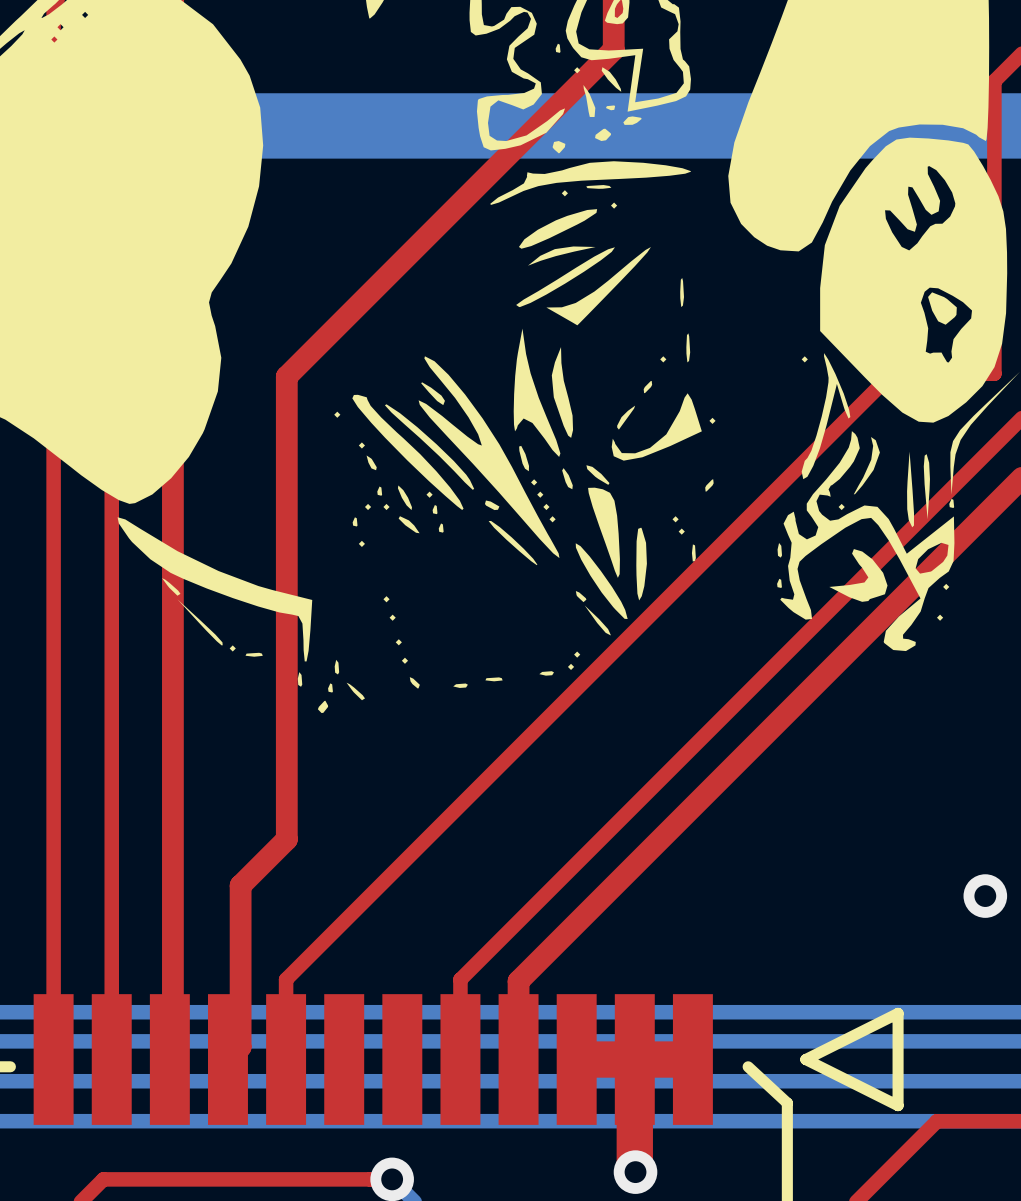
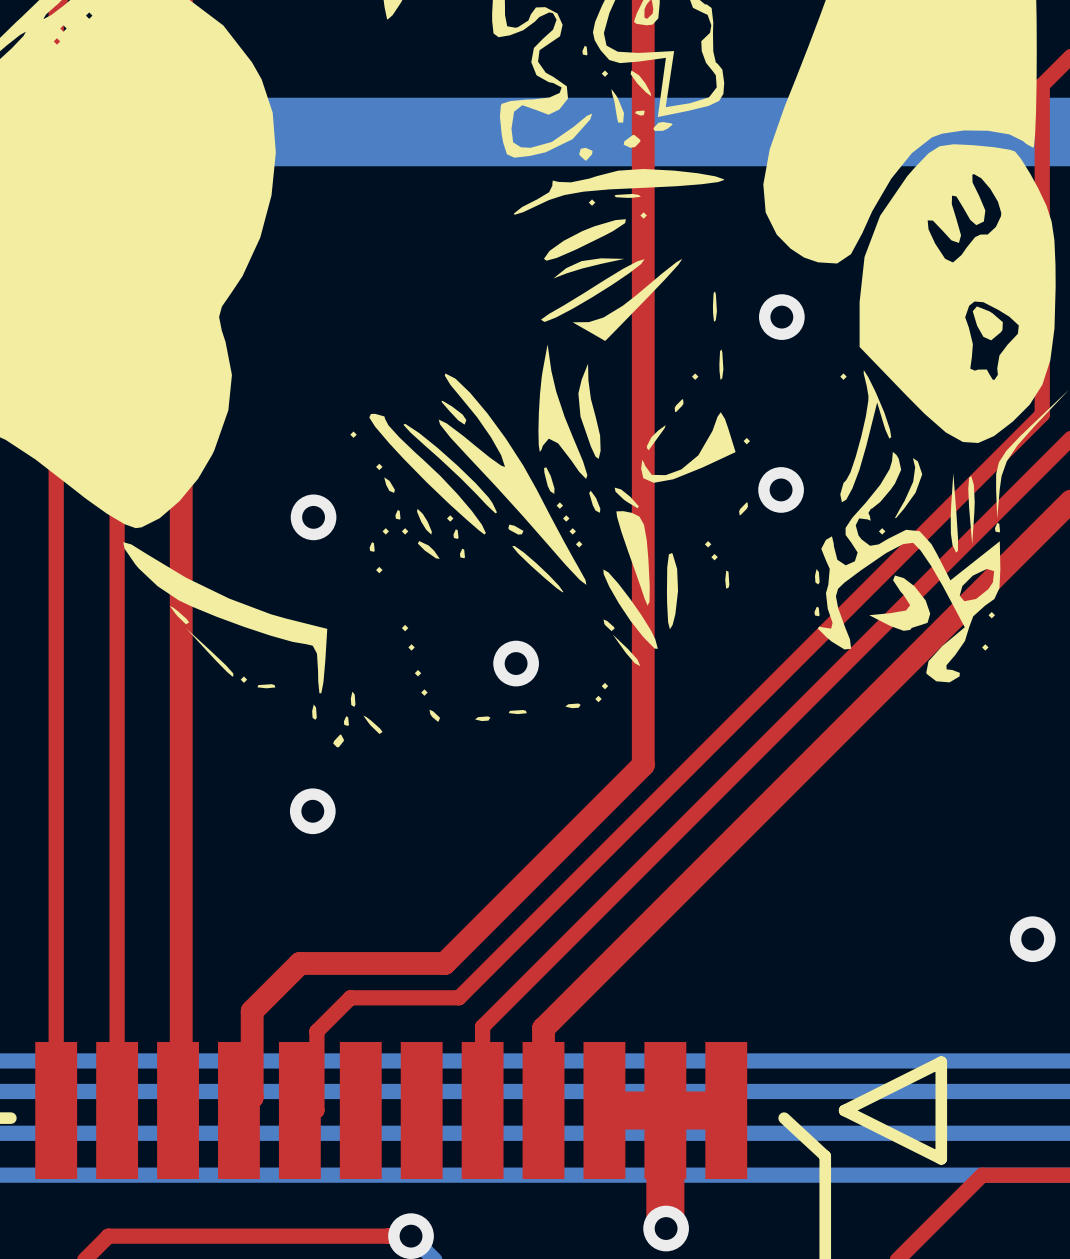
top track: (613, 49) (286, 376) (286, 839) (240, 885) (240, 964) -> (643, 52) (643, 764) (444, 963) (299, 963) (252, 1011)
via: none -> (781, 317)
top track: (994, 373) (891, 373) (286, 979) (286, 1059) -> (1042, 391) (1042, 414) (458, 997) (350, 997) (316, 1031) (316, 1110) (299, 1110)
via: none -> (781, 489)
via: none -> (313, 517)
via: none -> (516, 663)
via: none -> (312, 811)

